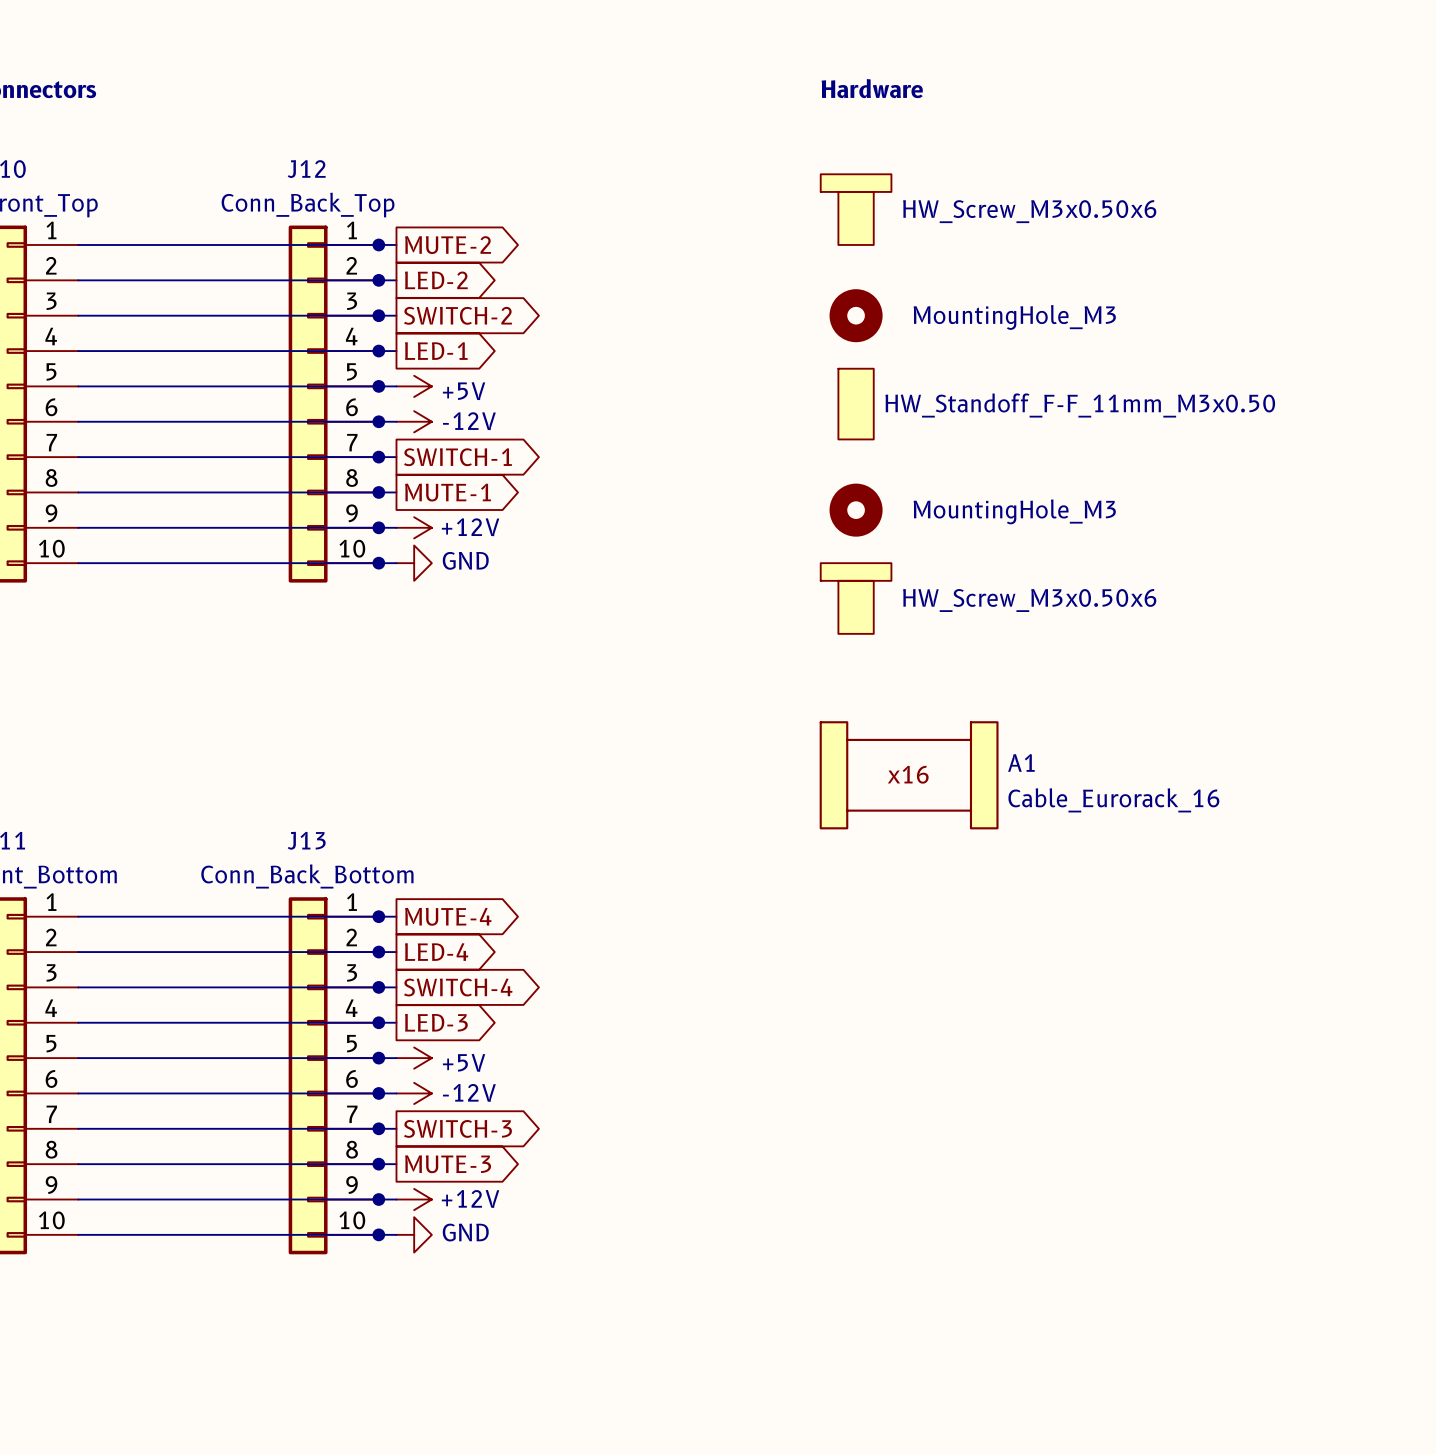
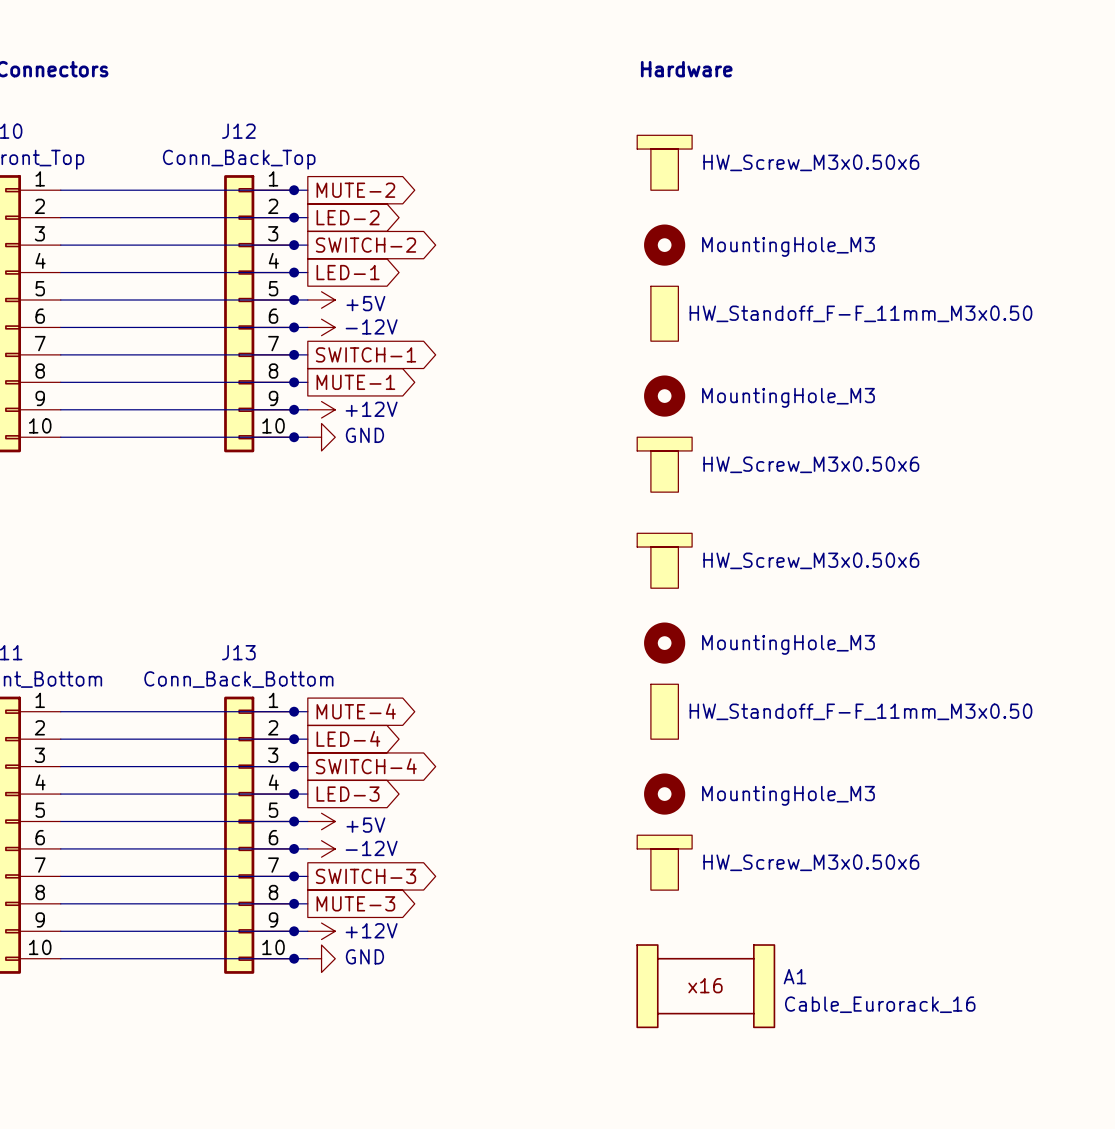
part: none -> HW_Screw_M3x0.50x6 (664, 560)
A1 position: (909, 775) -> (705, 986)
part: none -> MountingHole_M3 (664, 643)
part: none -> HW_Standoff_F-F_11mm_M3x0.50 (664, 711)
part: none -> MountingHole_M3 (664, 794)
part: none -> HW_Screw_M3x0.50x6 (664, 862)

